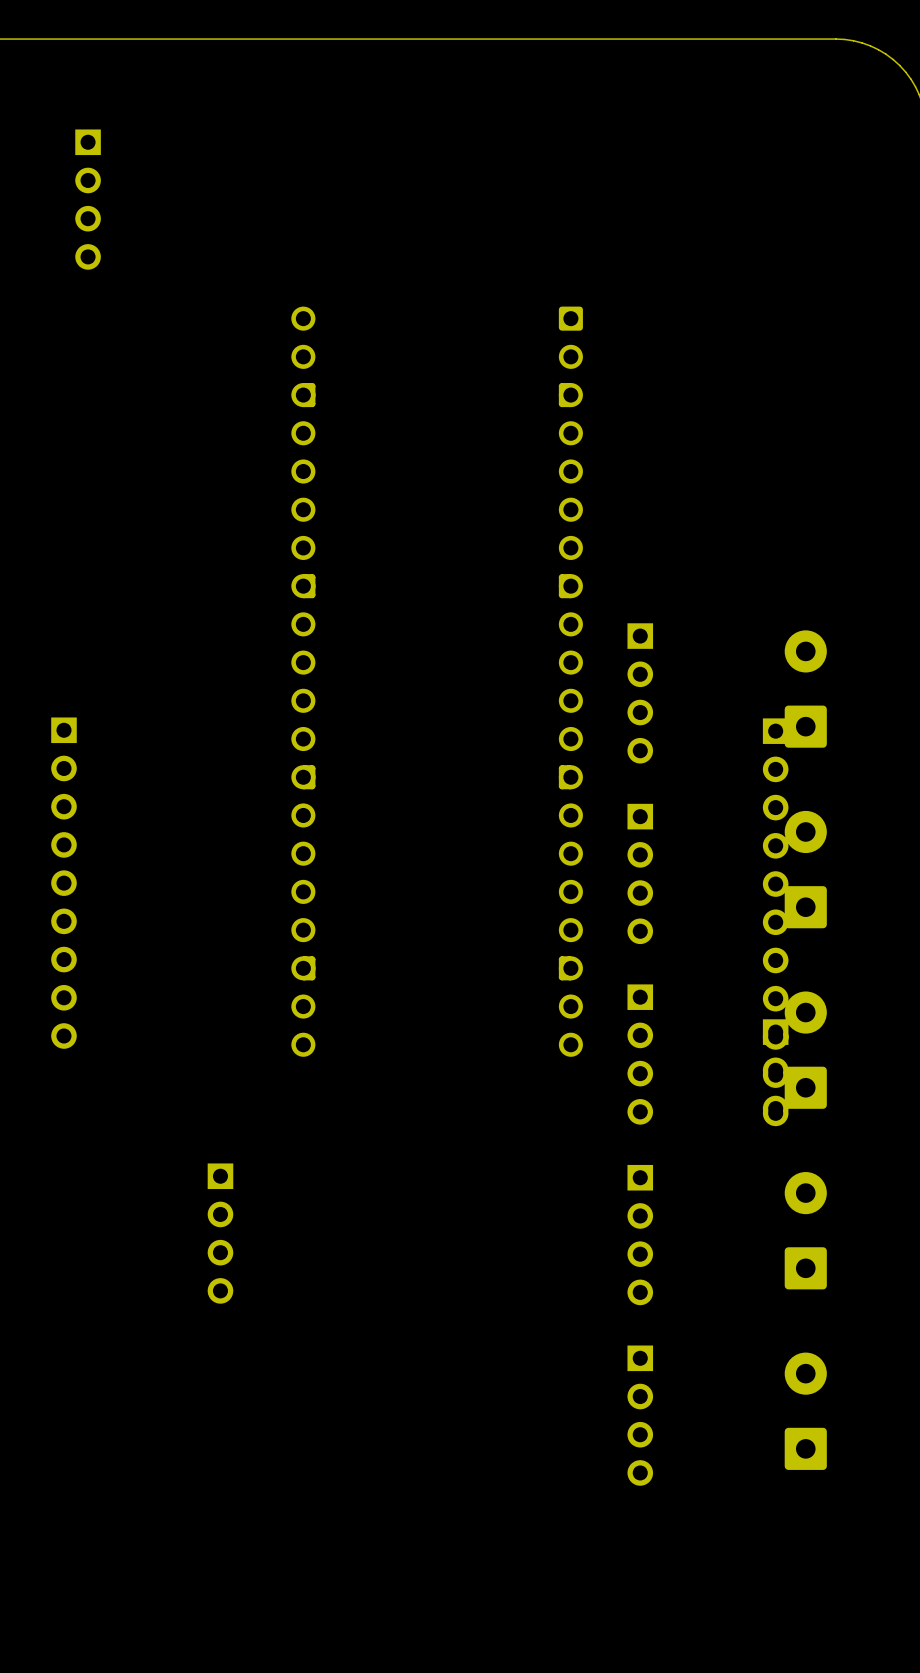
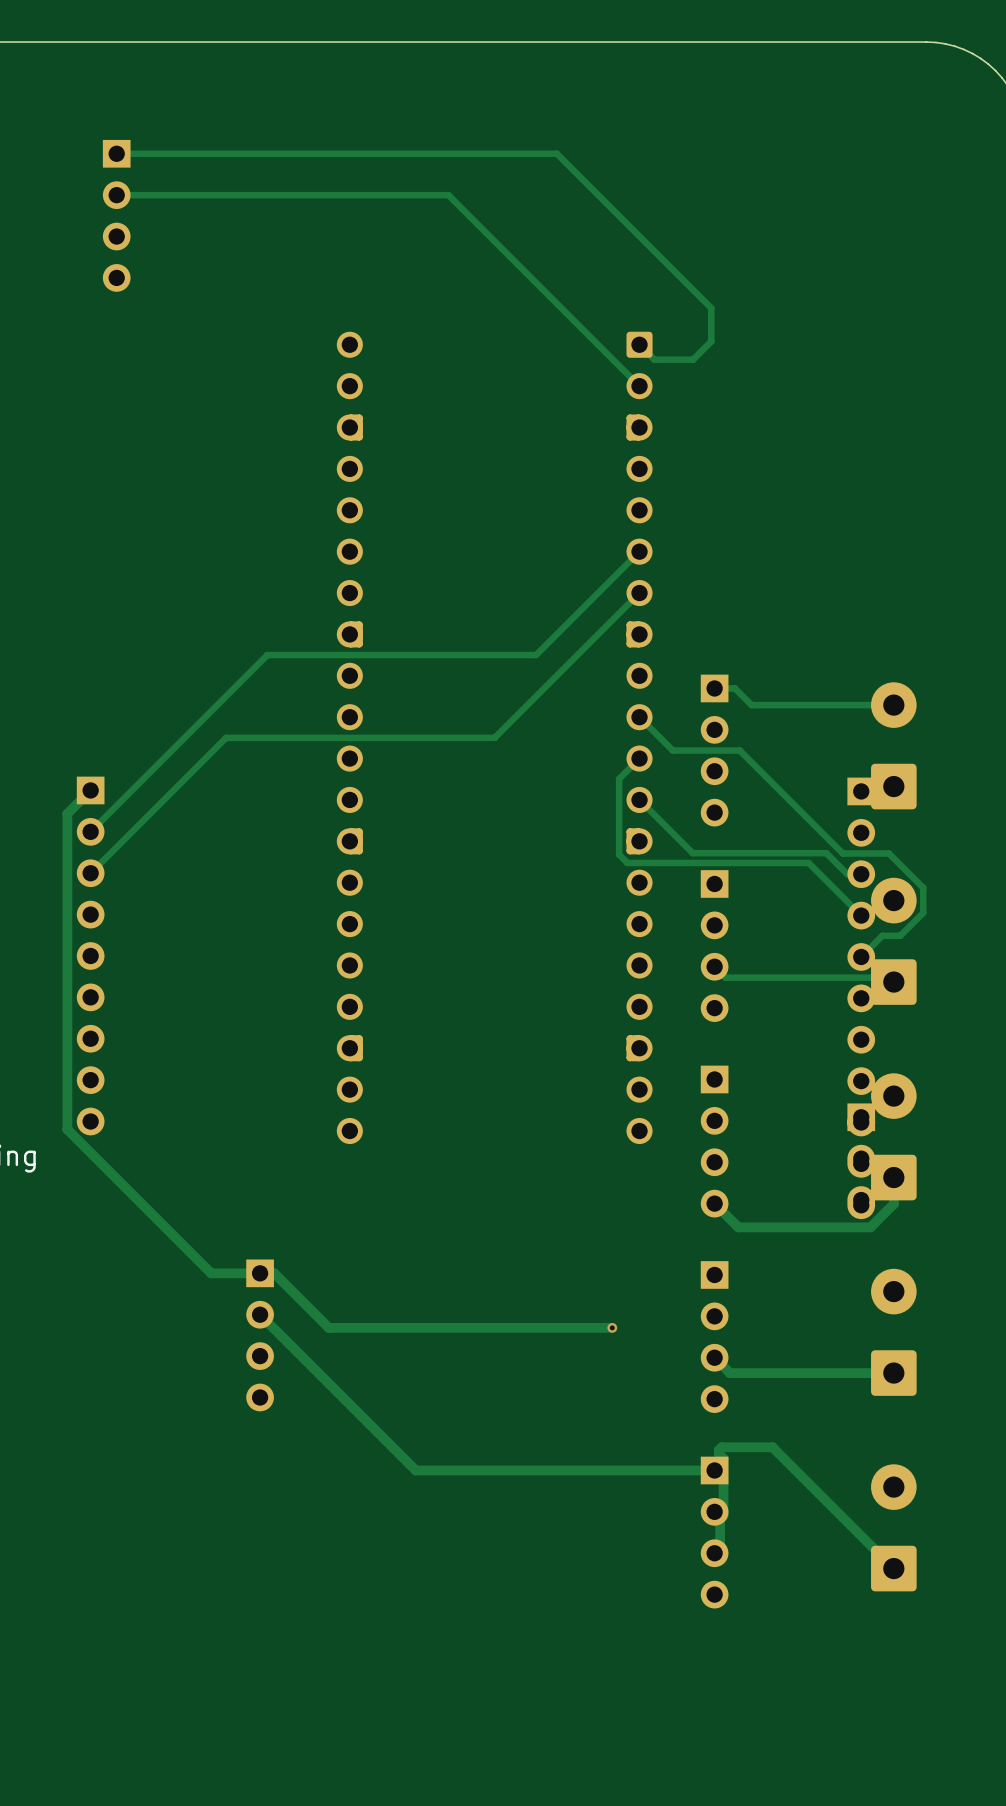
track: none -> (116, 153) (556, 153) (711, 308) (711, 341) (693, 359) (654, 359) (639, 344)
track: none -> (116, 195) (448, 195) (639, 386)
track: none -> (639, 551) (536, 655) (267, 655) (90, 831)
track: none -> (639, 593) (494, 737) (225, 737) (90, 873)
track: none -> (714, 688) (735, 688) (751, 705) (893, 705)
track: none -> (639, 717) (672, 750) (739, 750) (842, 853) (888, 853) (923, 887) (923, 912) (900, 935) (882, 935) (861, 956)
track: none -> (639, 758) (619, 778) (619, 854) (627, 862) (808, 862) (861, 915)
track: none -> (90, 790) (67, 813) (67, 1129) (211, 1273) (274, 1273) (328, 1327) (612, 1327)
track: none -> (639, 799) (692, 853) (826, 853) (847, 874) (861, 874)
track: none -> (714, 966) (725, 977) (889, 977) (893, 982)
track: none -> (893, 1177) (893, 1204) (870, 1227) (738, 1227) (714, 1203)
track: none -> (260, 1314) (415, 1470) (714, 1470)
via: none -> (612, 1327)
track: none -> (714, 1357) (729, 1373) (893, 1373)
track: none -> (714, 1553) (720, 1547) (720, 1519) (723, 1515) (723, 1458) (718, 1454) (718, 1450) (721, 1447) (772, 1447) (893, 1568)

